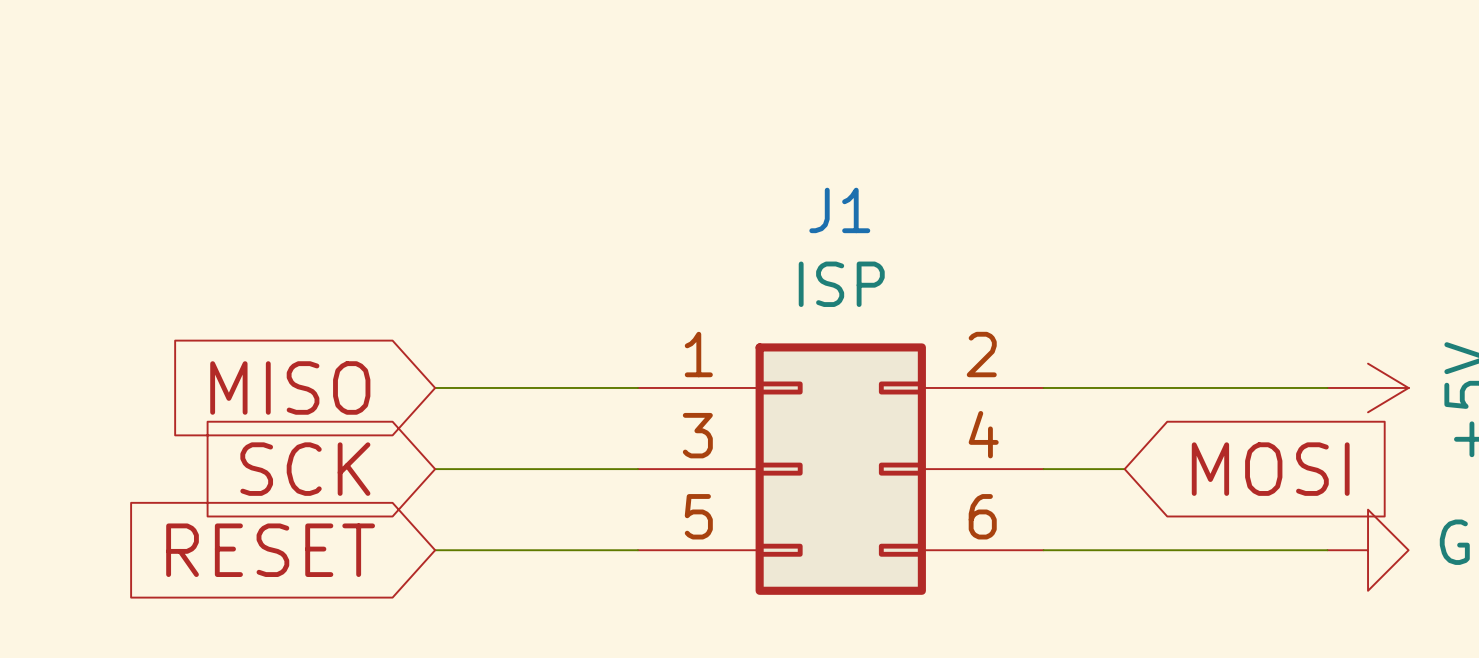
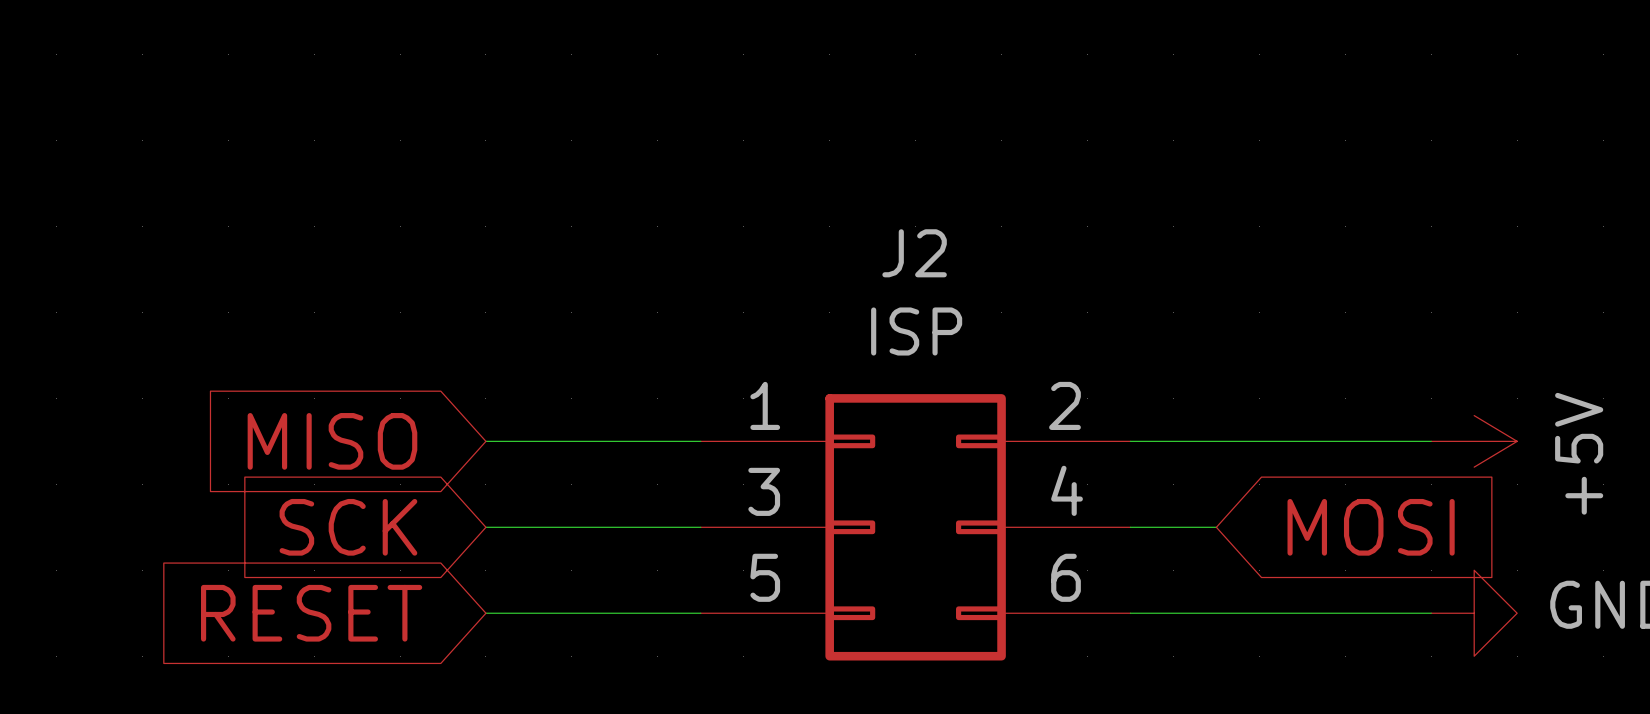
J1 name: J1 (839, 210) -> J2 (914, 253)

